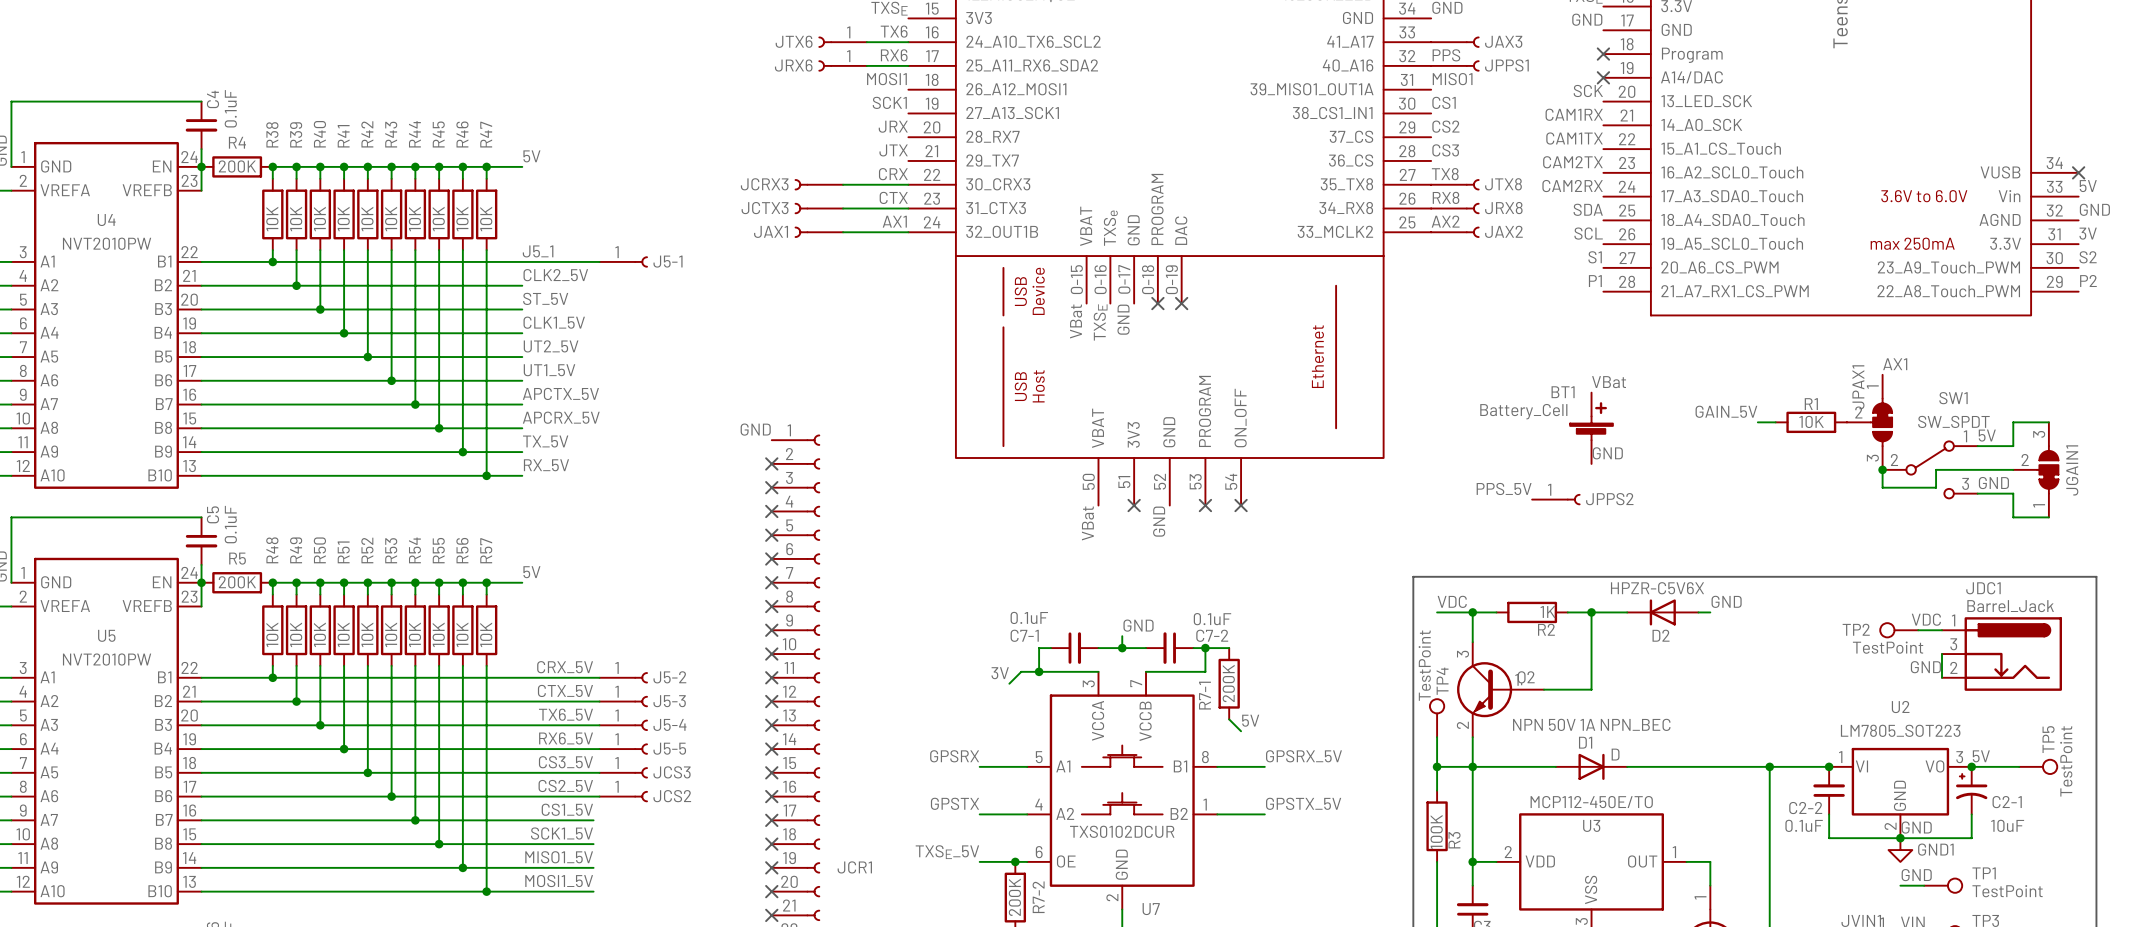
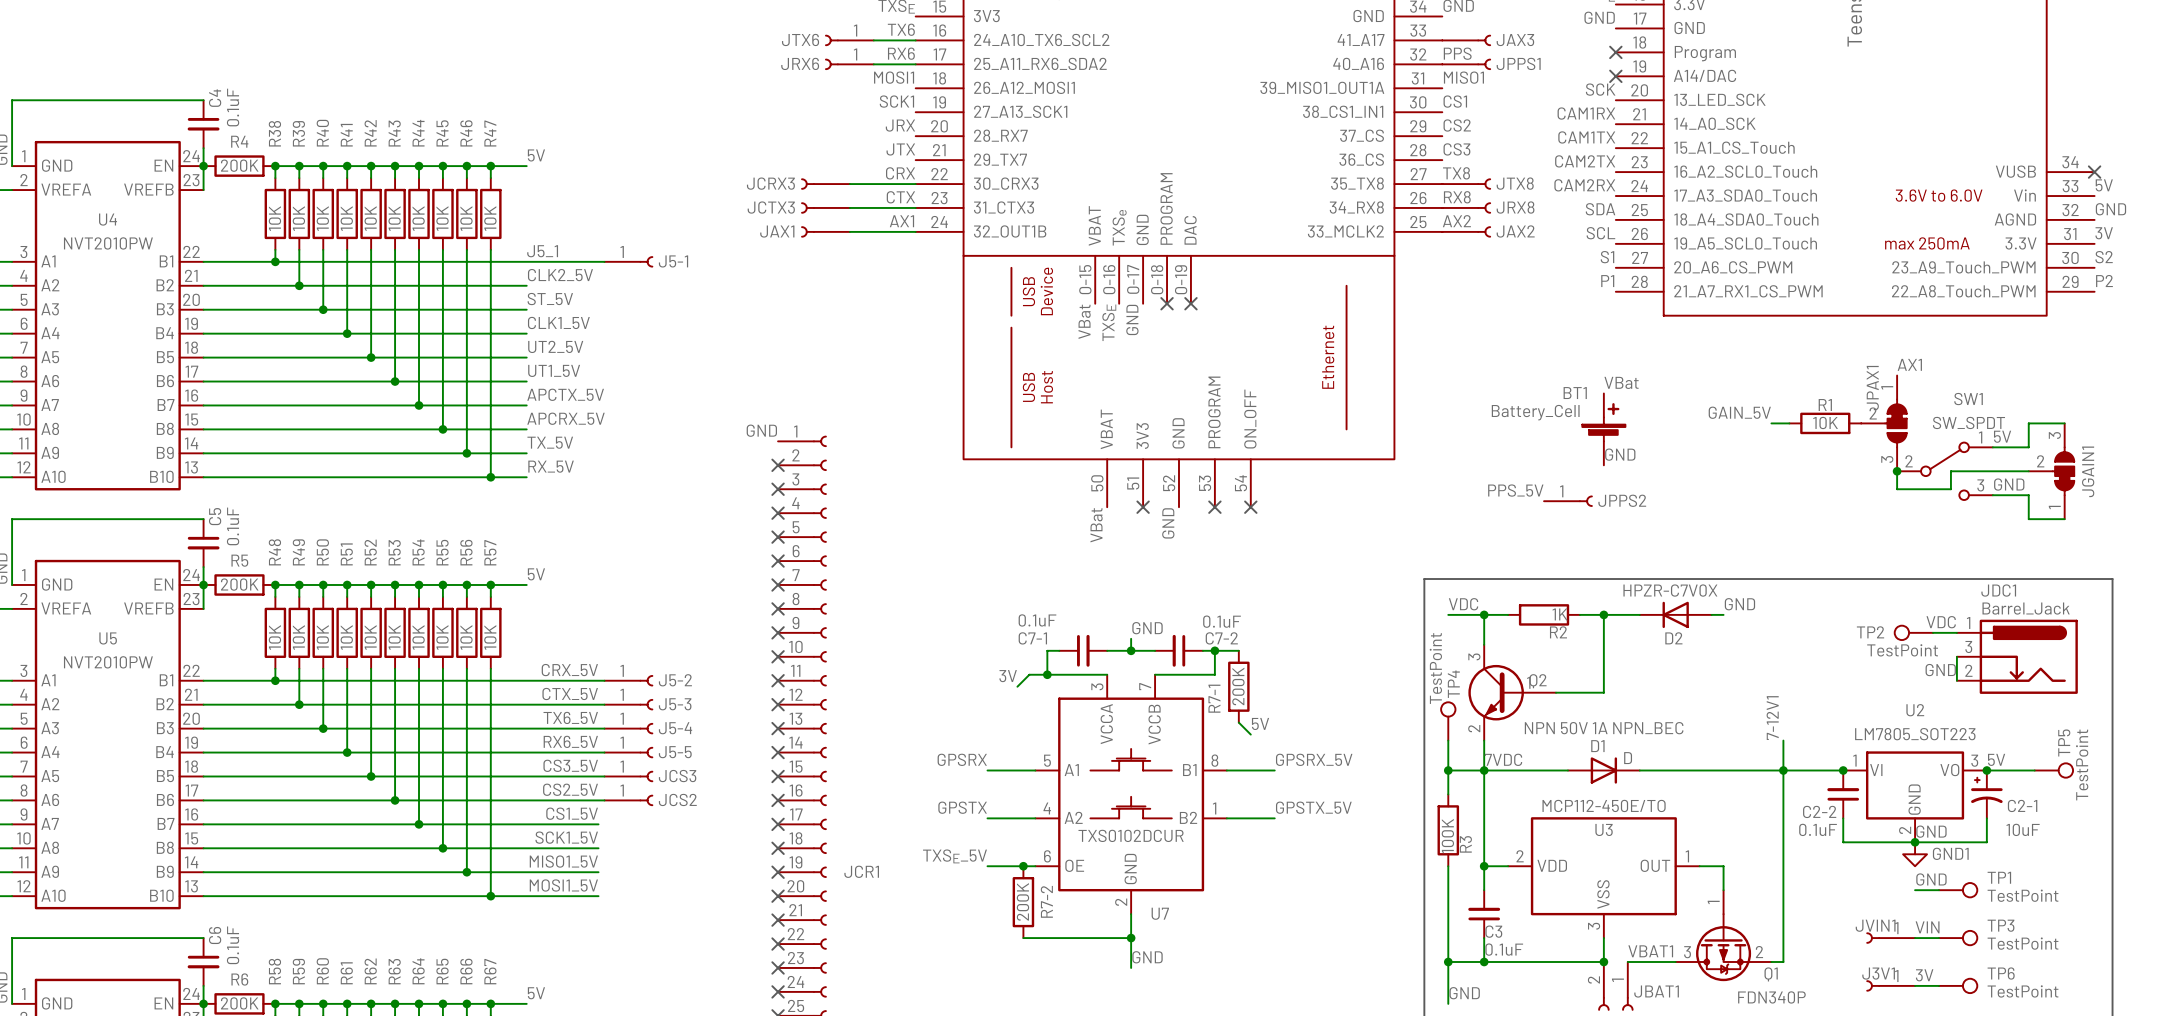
D2 value: HPZR-C5V6X (1657, 588) -> HPZR-C7V0X (1670, 590)
label: none -> 7-12V1 (1772, 718)
wire: none -> (1783, 740) (1783, 770)
label: none -> 7VDC (1503, 759)

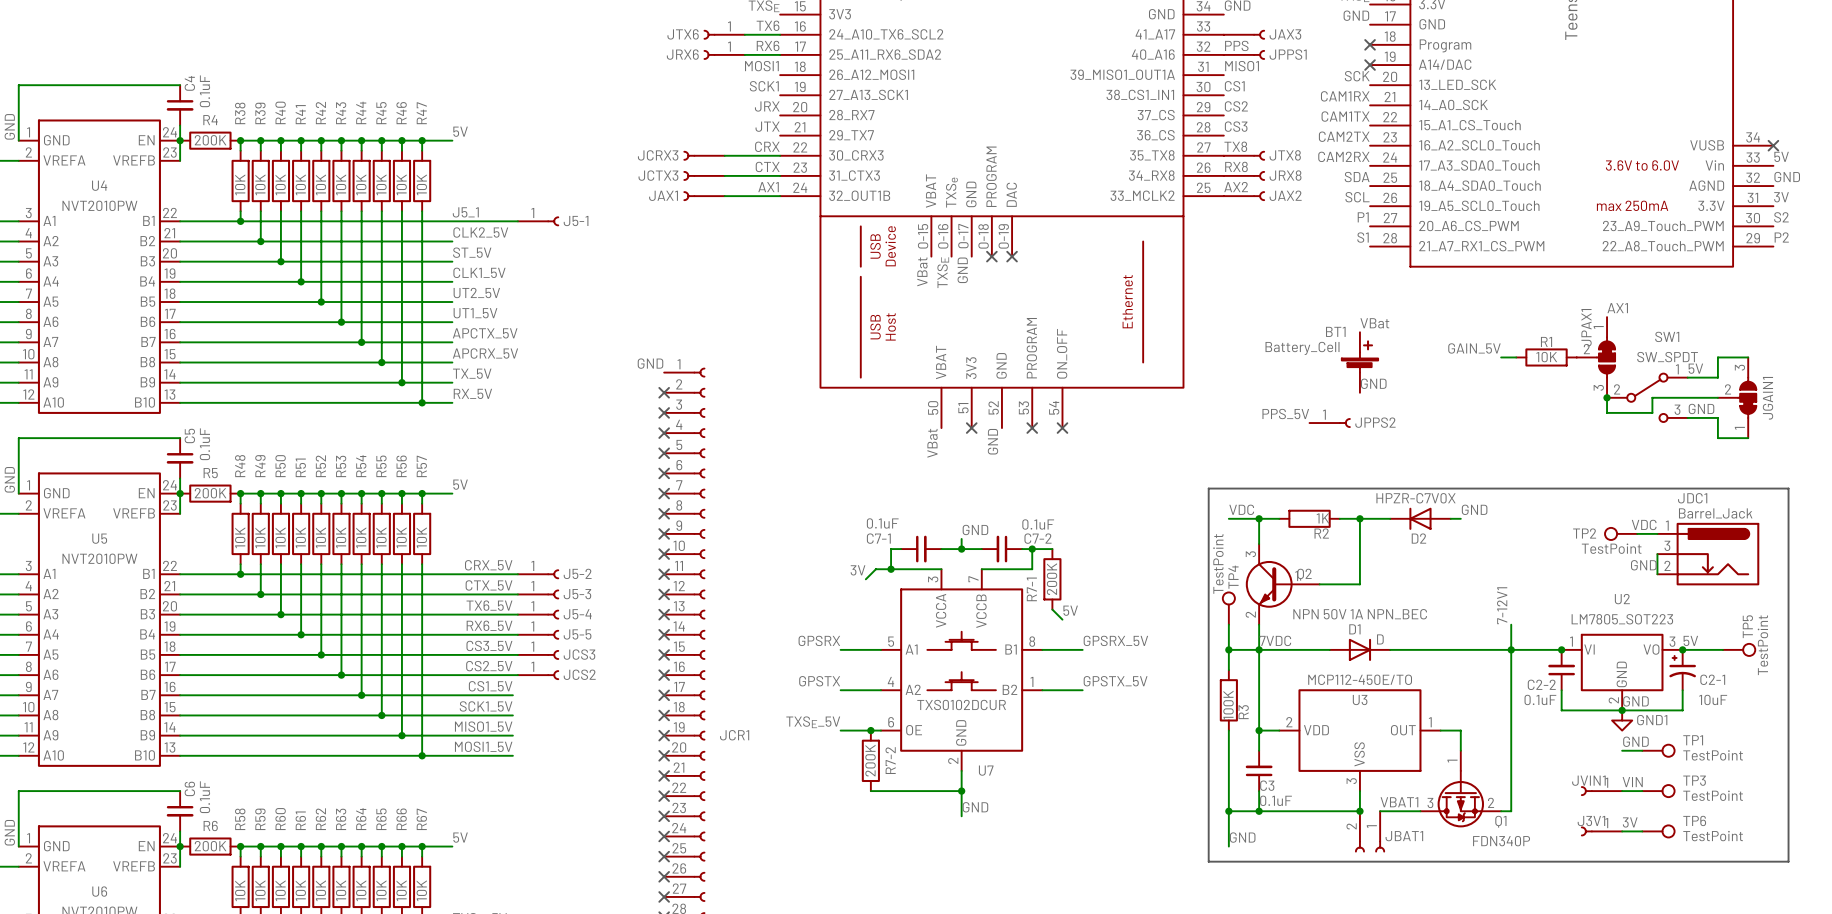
label: S1 (1607, 257) -> P1 (1363, 217)
label: P1 (1607, 281) -> S1 (1363, 237)

